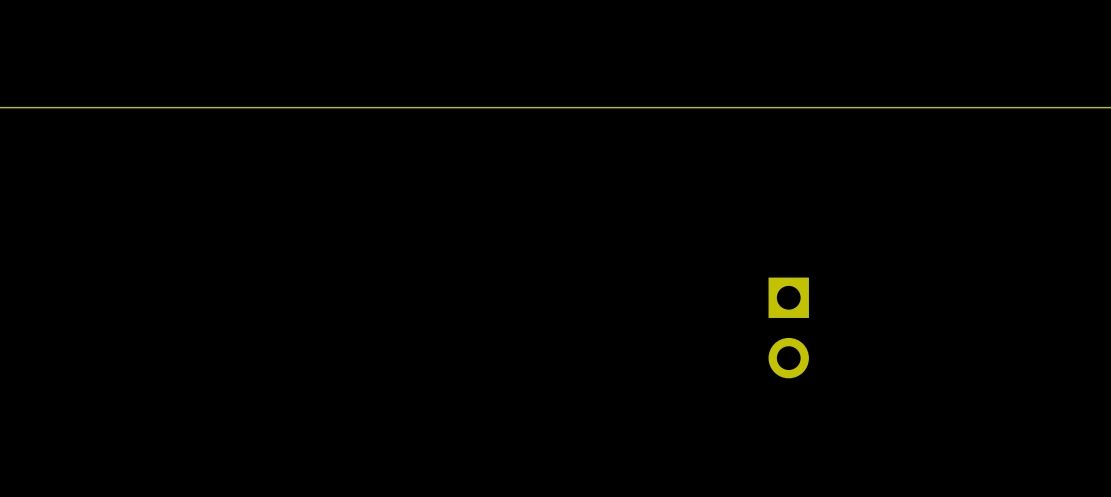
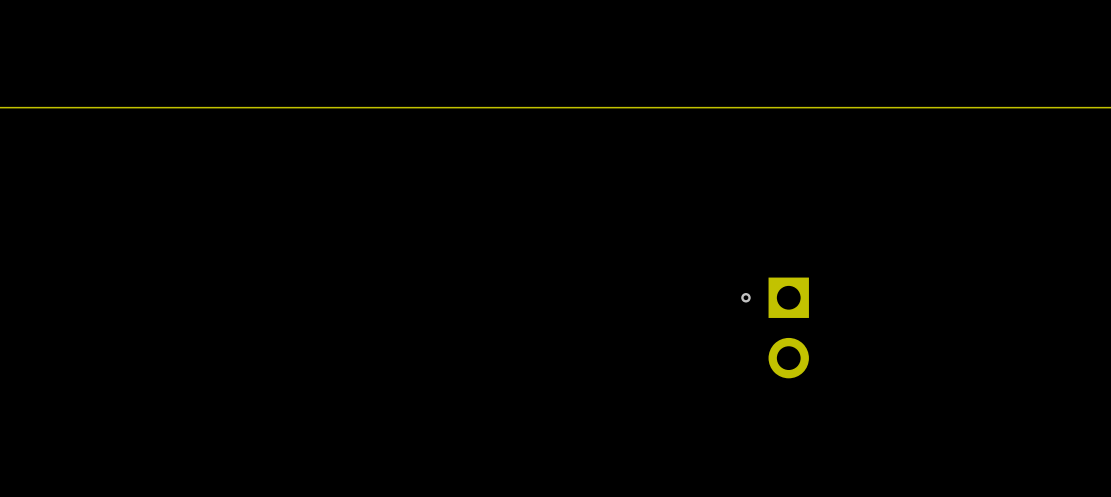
via: none -> (745, 297)

